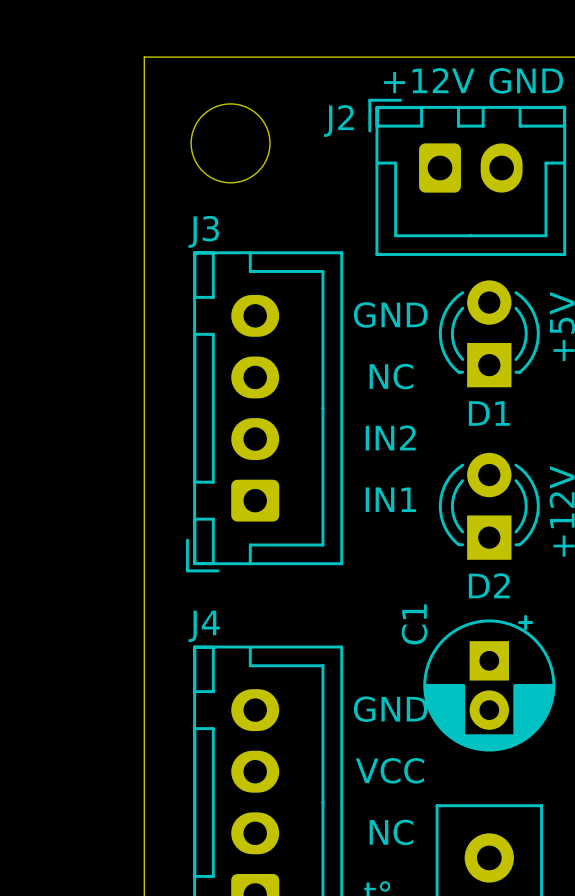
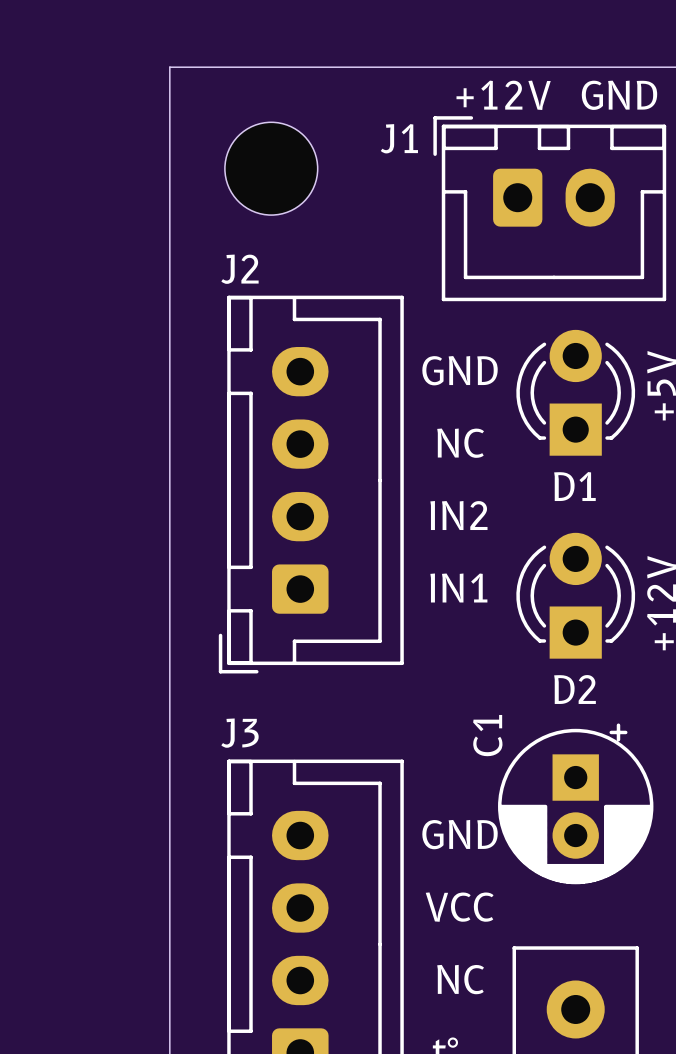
J2 name: J2 (338, 120) -> J1 (399, 138)
J3 name: J3 (203, 231) -> J2 (239, 269)
J4 name: J4 (204, 626) -> J3 (239, 733)

